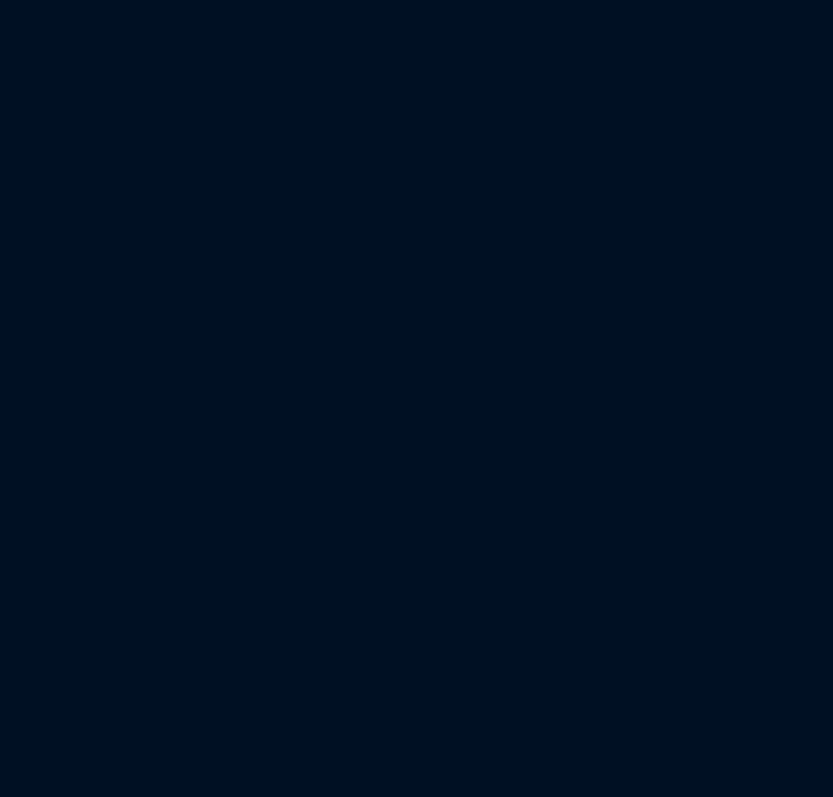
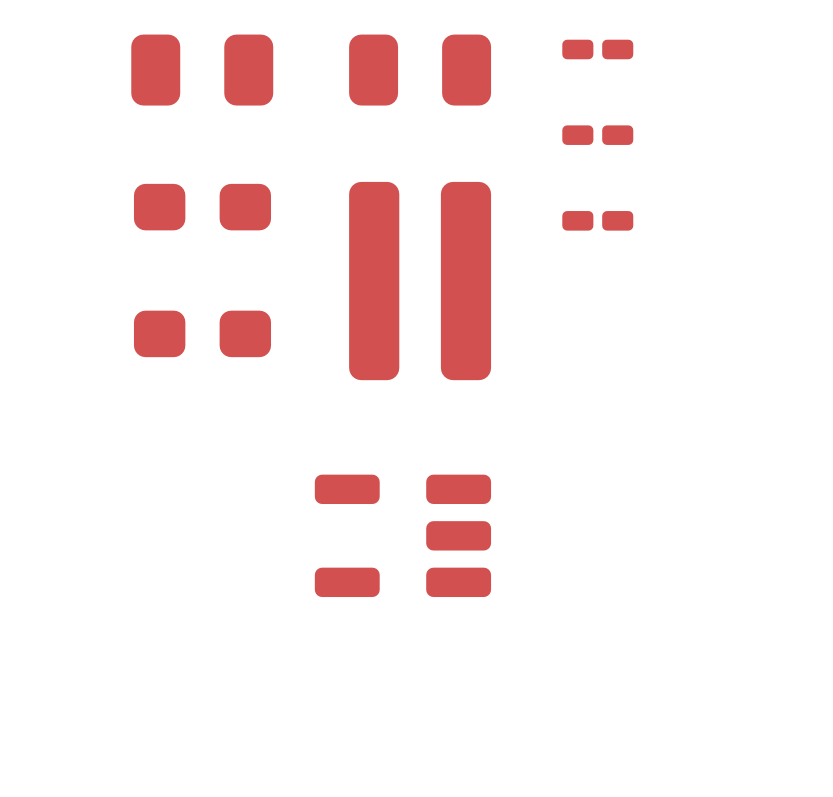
part: none -> (597, 49)
part: none -> (202, 70)
part: none -> (420, 70)
part: none -> (597, 135)
part: none -> (202, 207)
part: none -> (597, 220)
part: none -> (420, 281)
part: none -> (202, 333)
part: none -> (402, 535)

